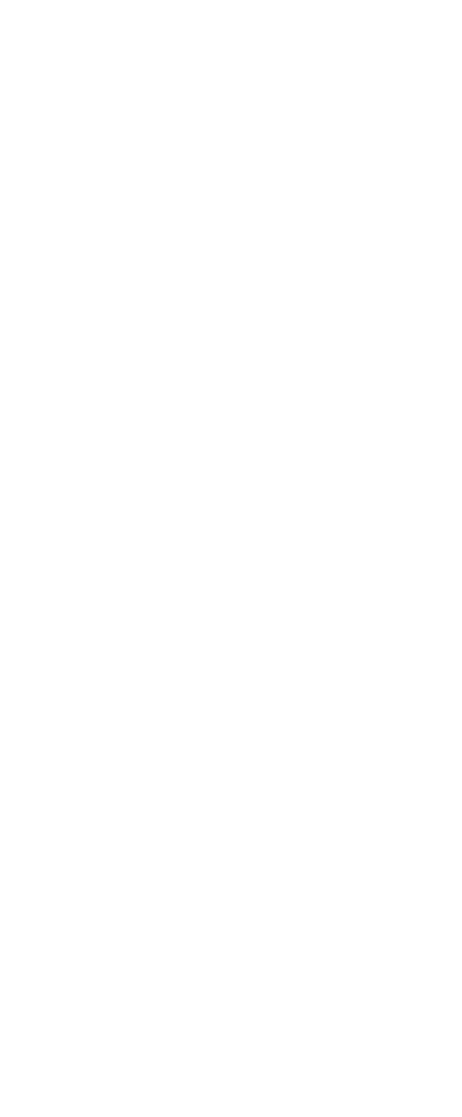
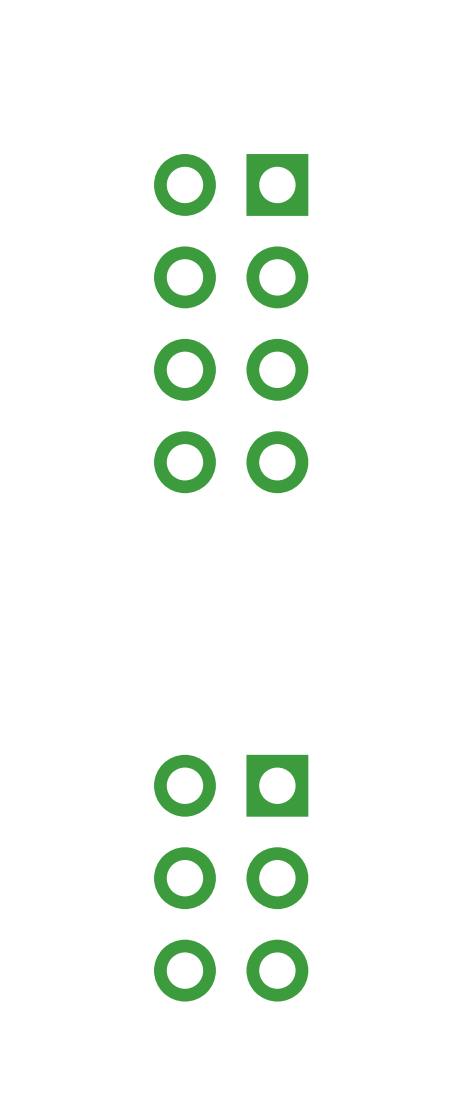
part: none -> (231, 323)
part: none -> (231, 878)

